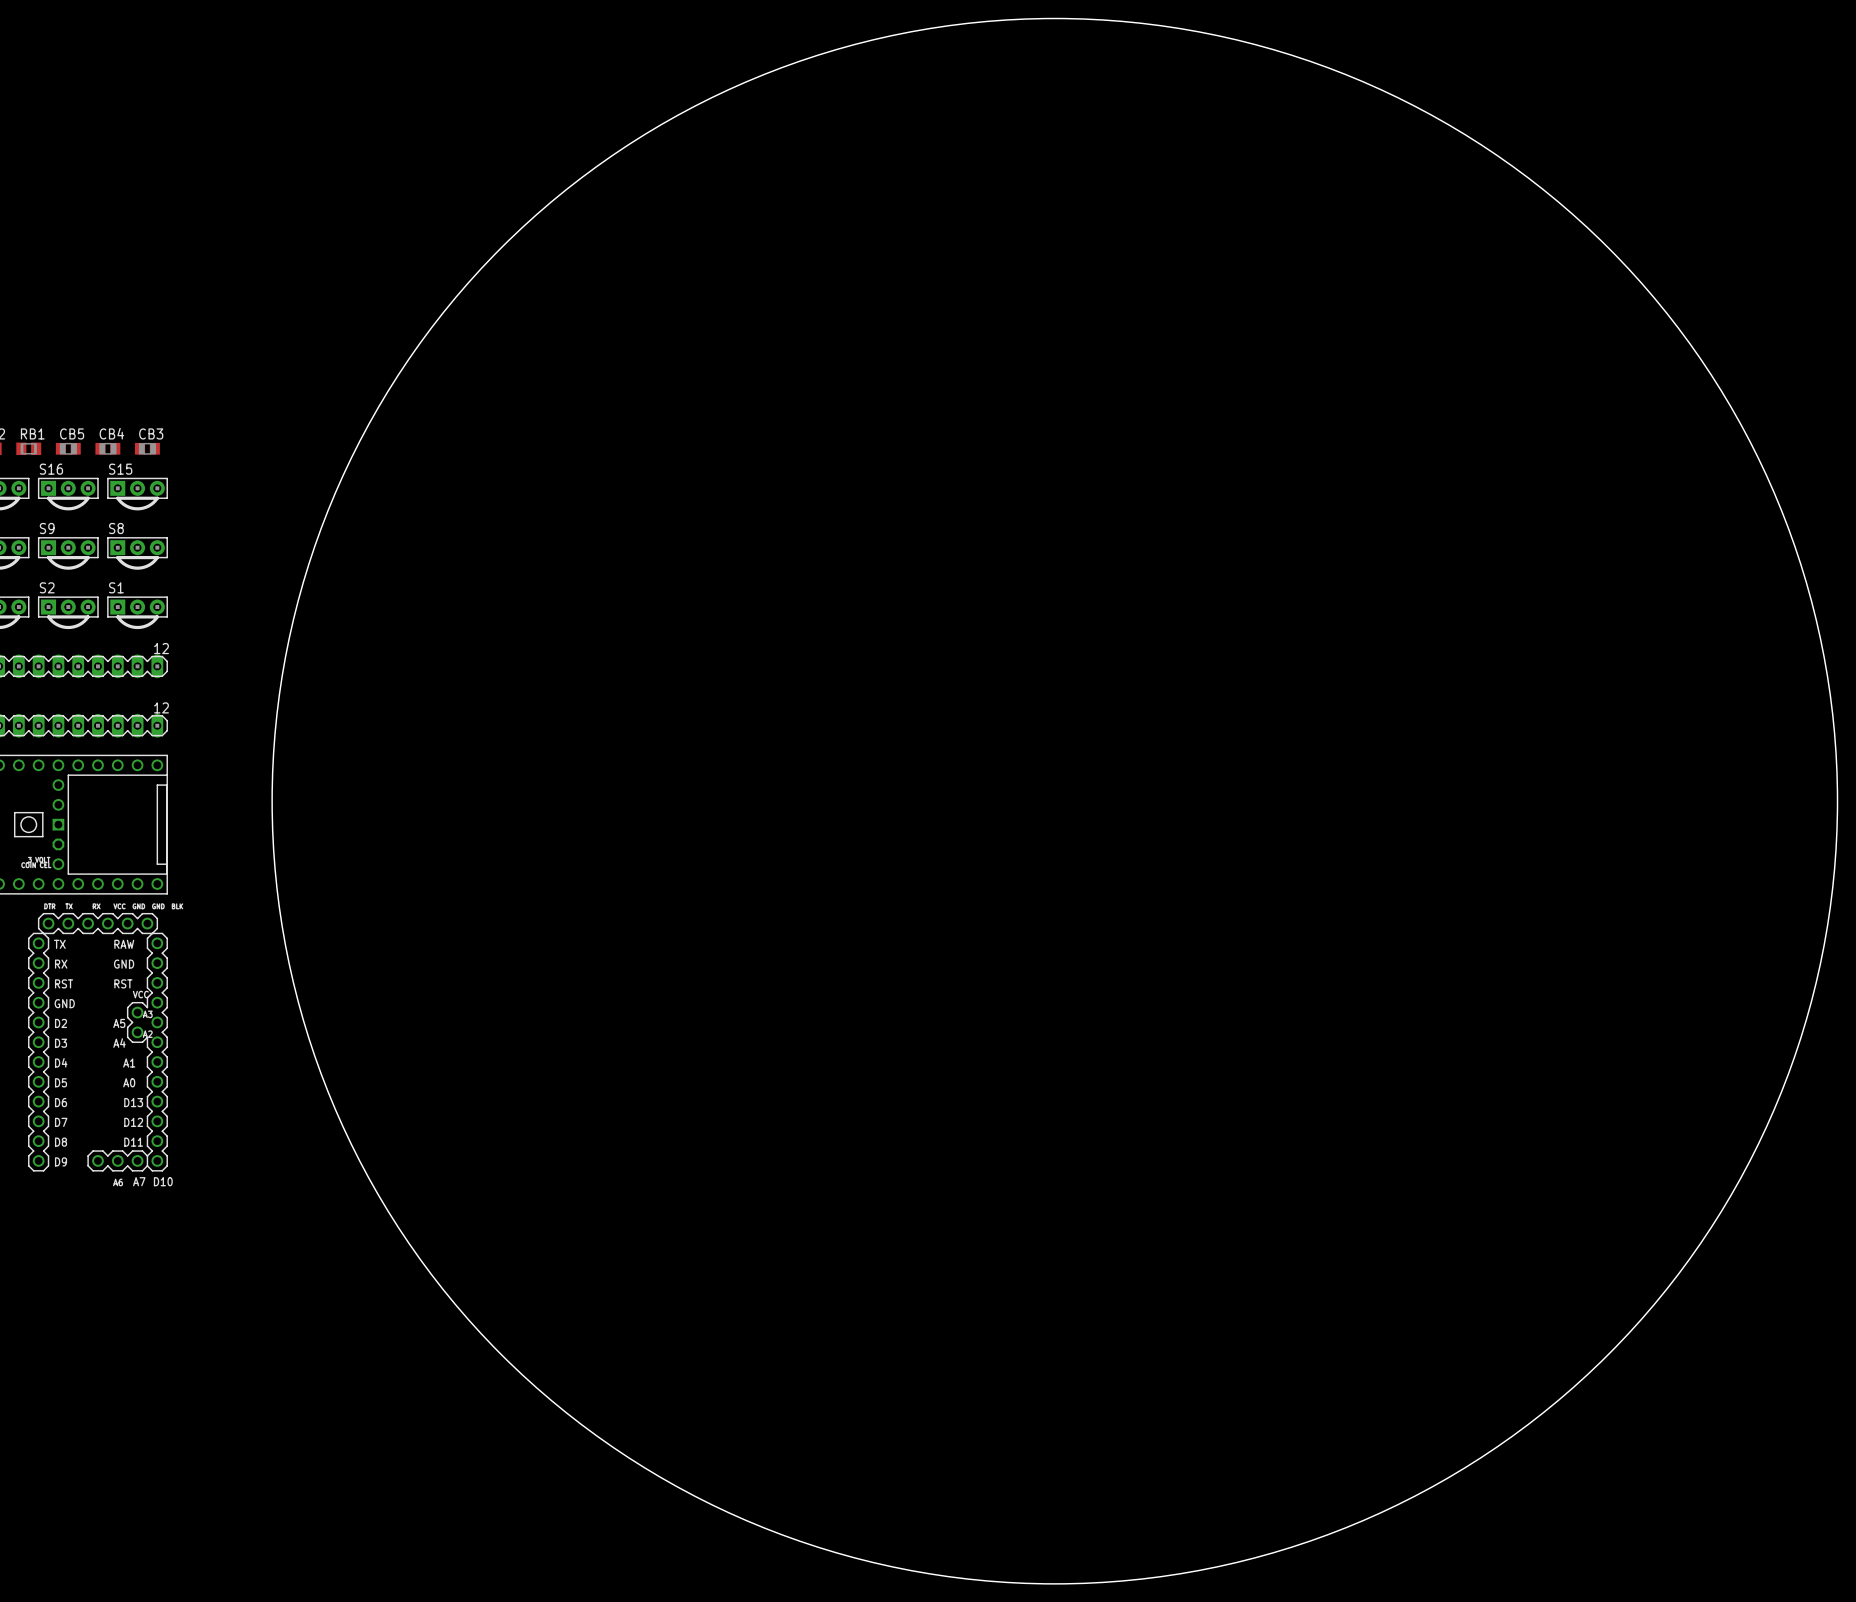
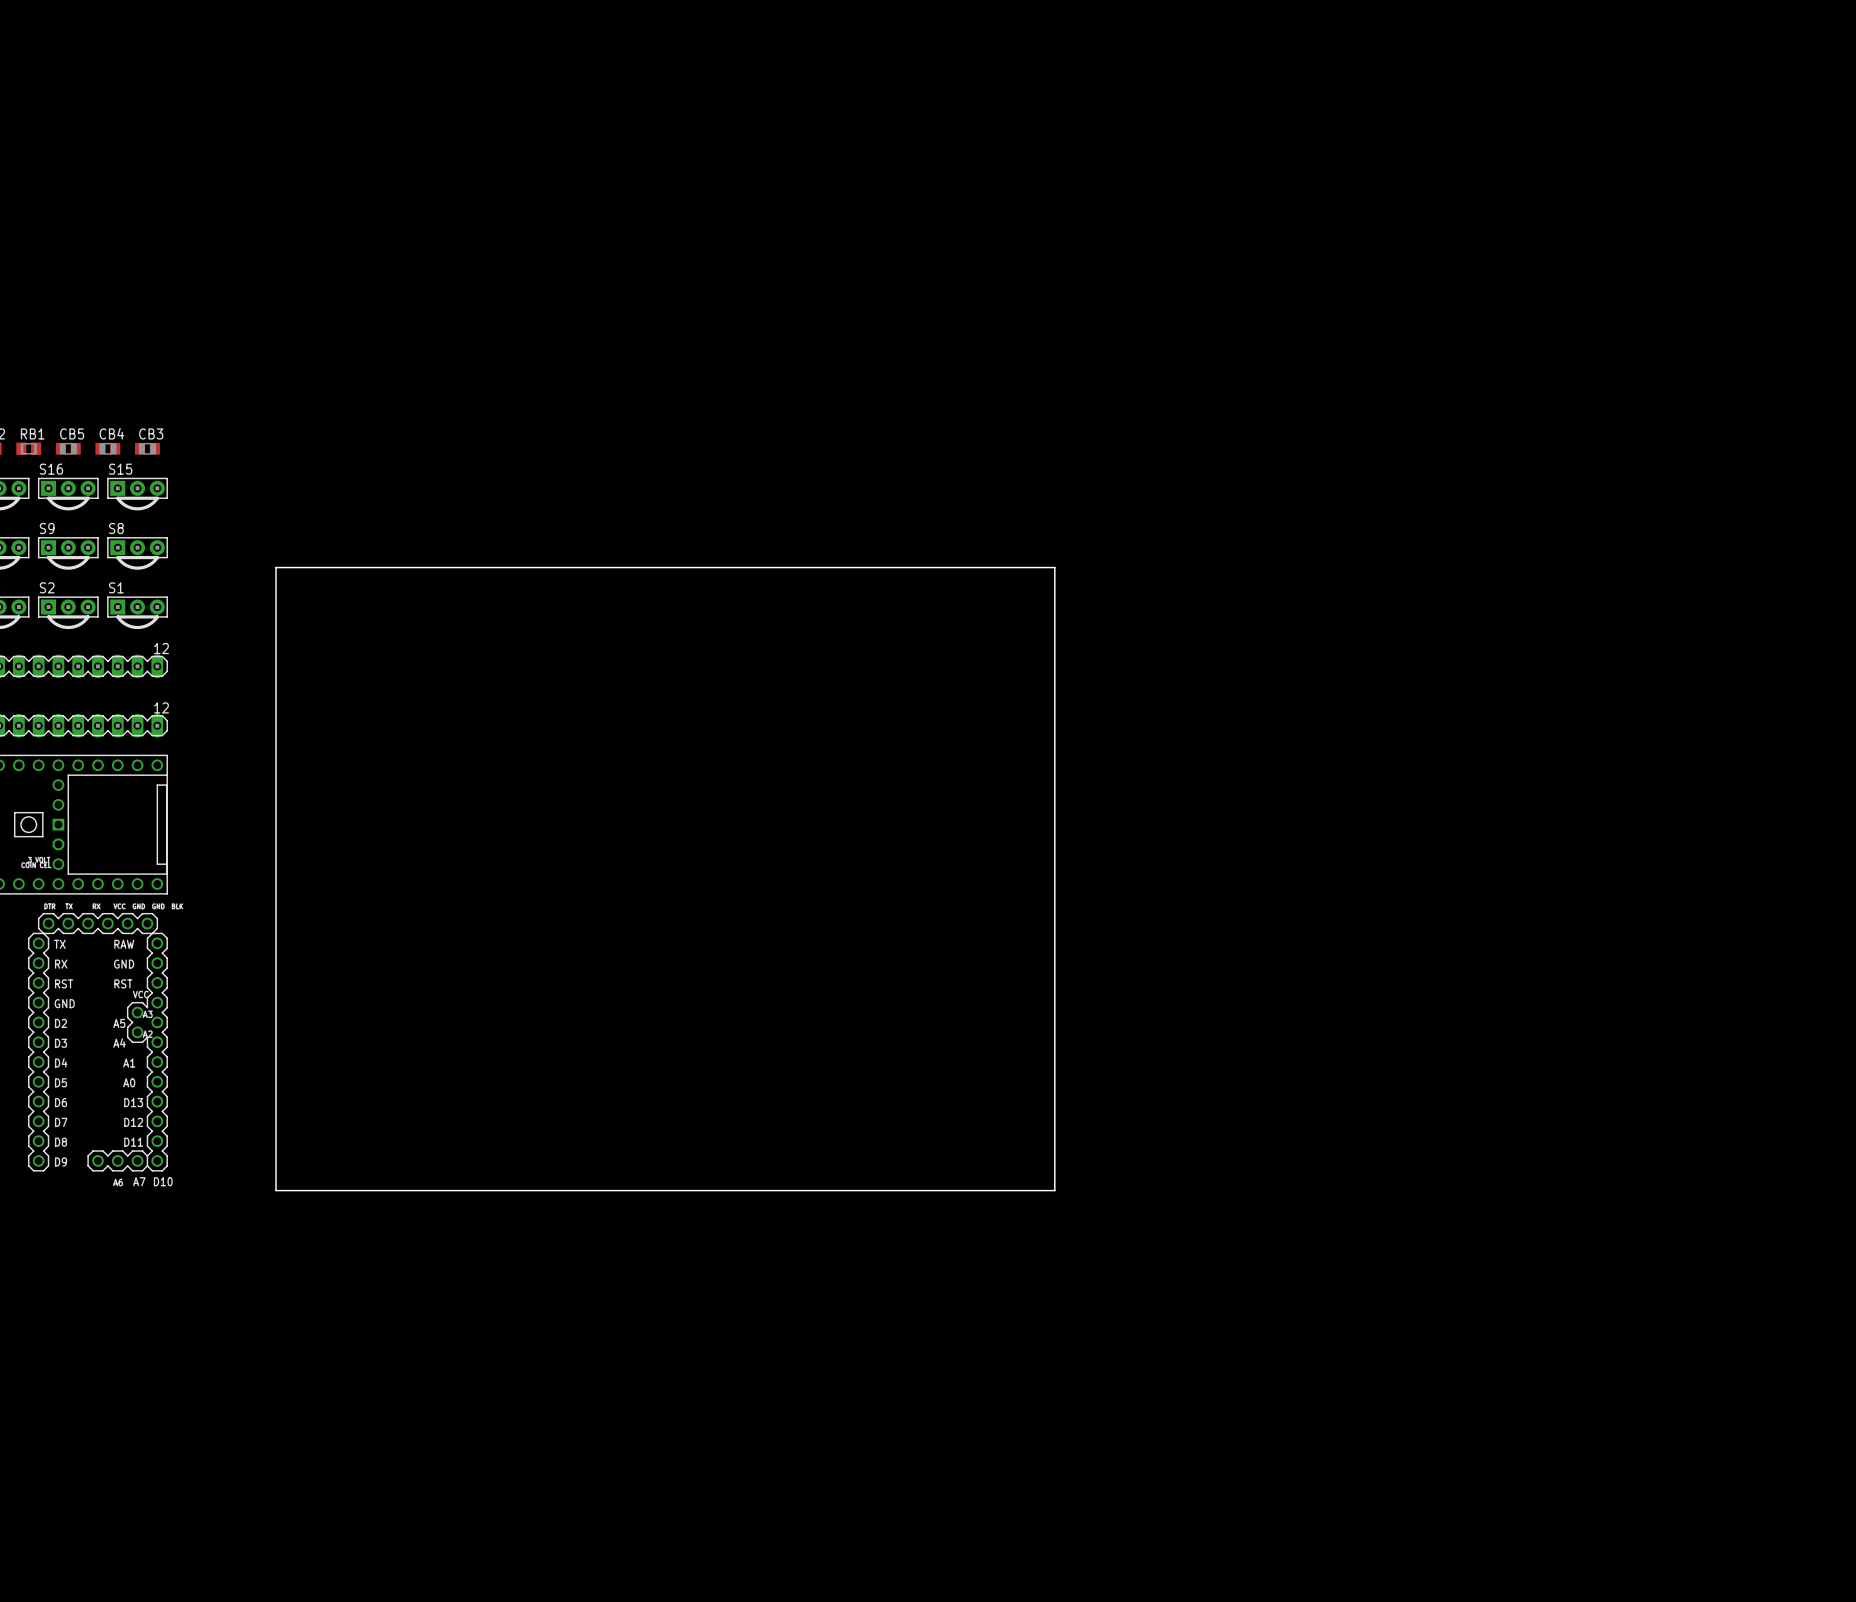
round board edge: [271, 17, 1839, 1585] -> none
board edge: none -> (276, 567) (1054, 567) (1054, 1190) (276, 1190) (276, 567)

